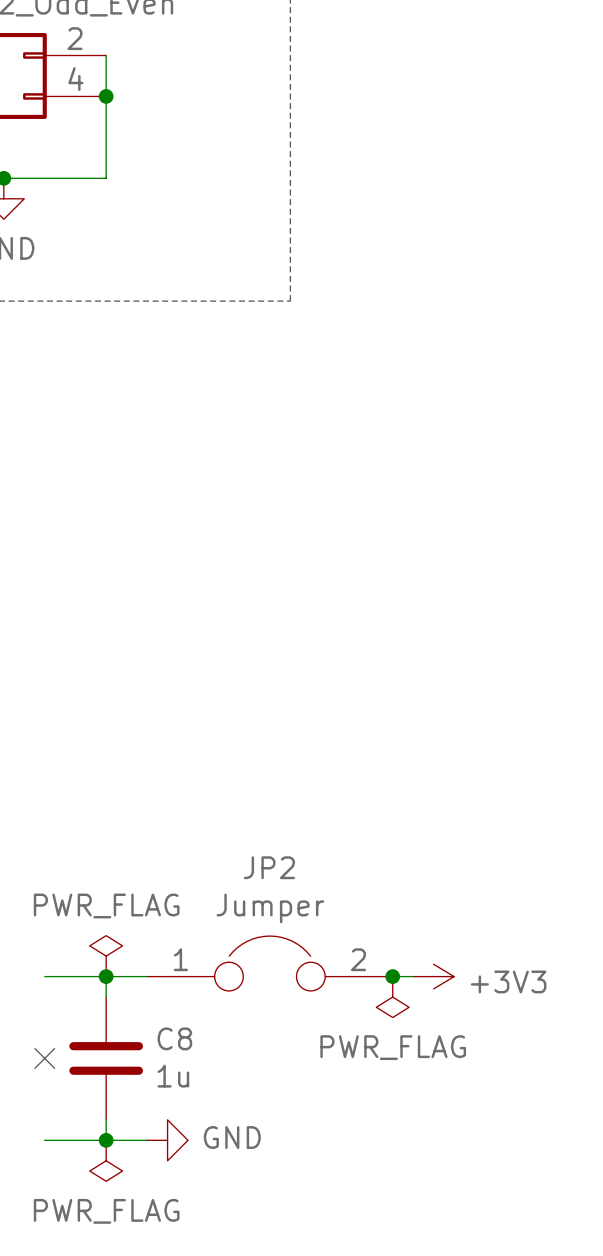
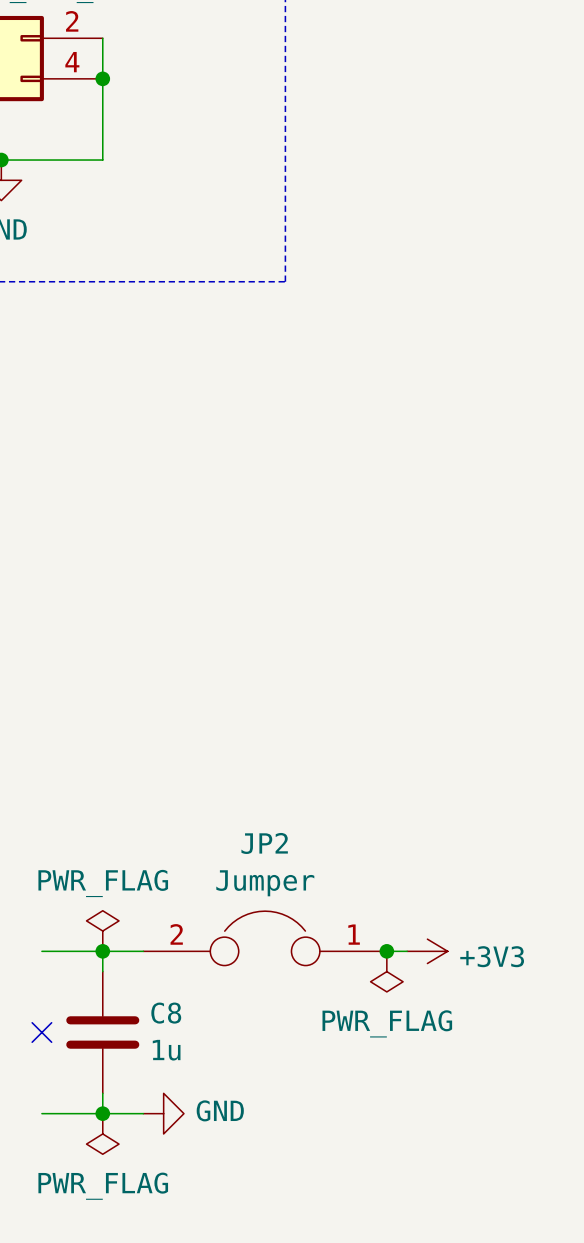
JP2 flip: as is (269, 963) -> left-right (265, 938)

